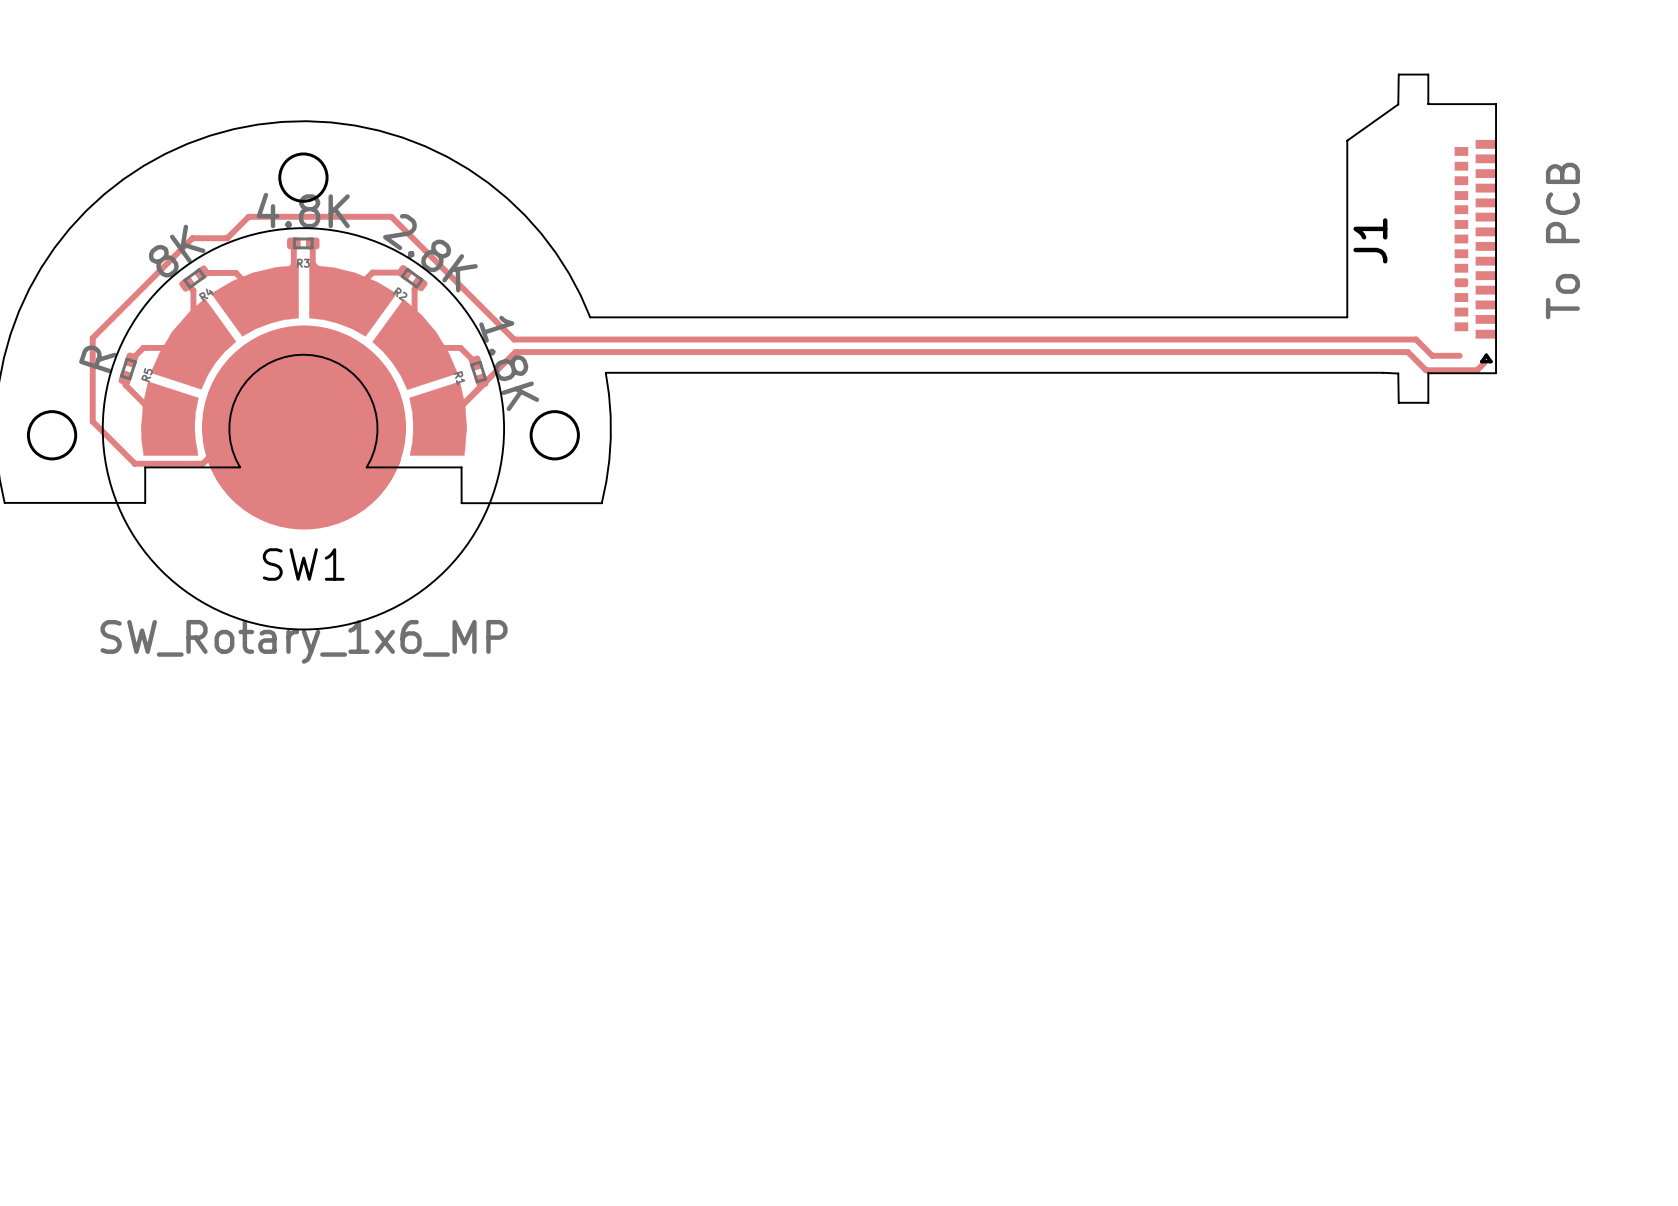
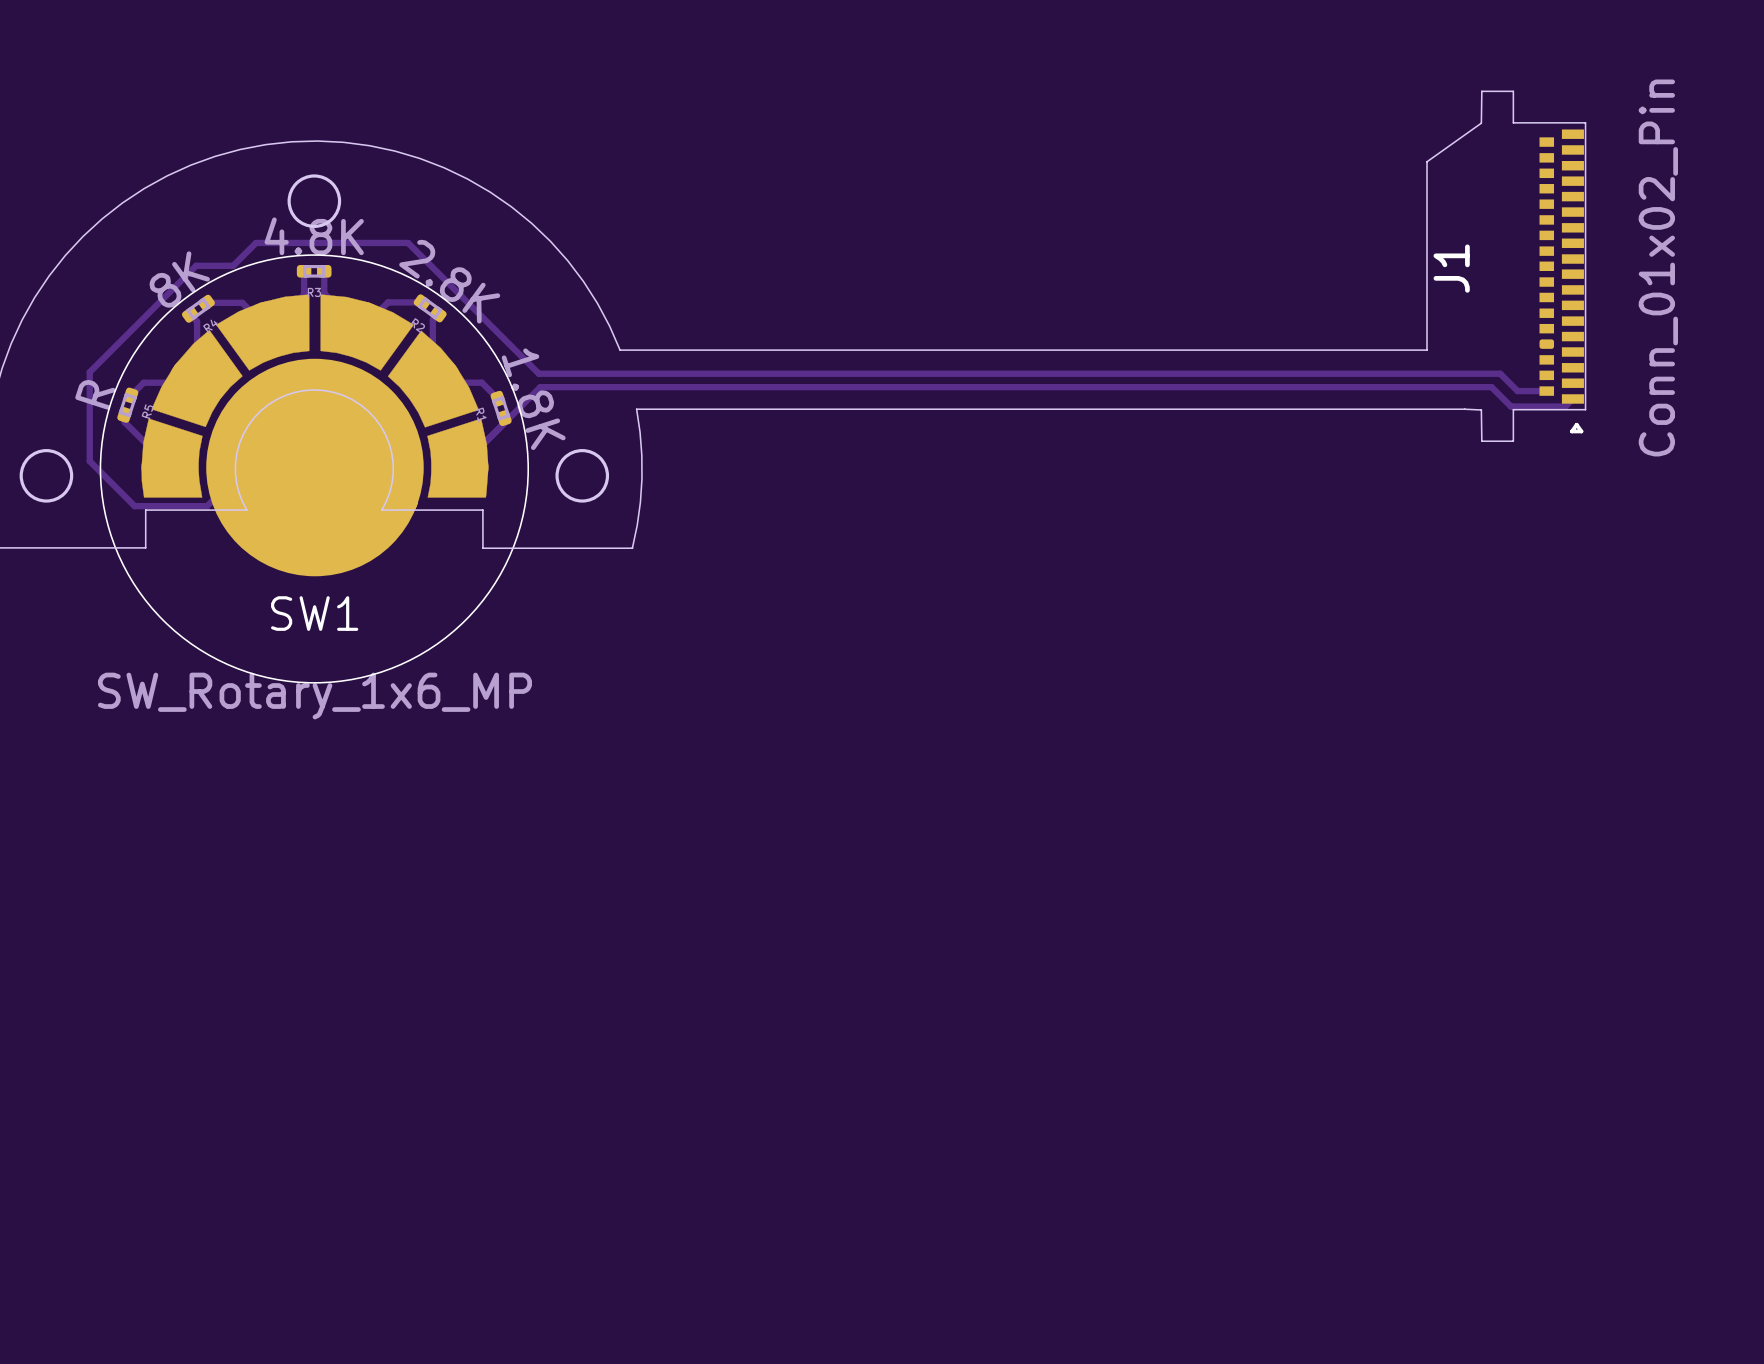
J1 footprint: [1397, 73, 1497, 404] -> [1481, 90, 1587, 442]
J1 value: To PCB (1562, 240) -> Conn_01x02_Pin (1658, 267)

